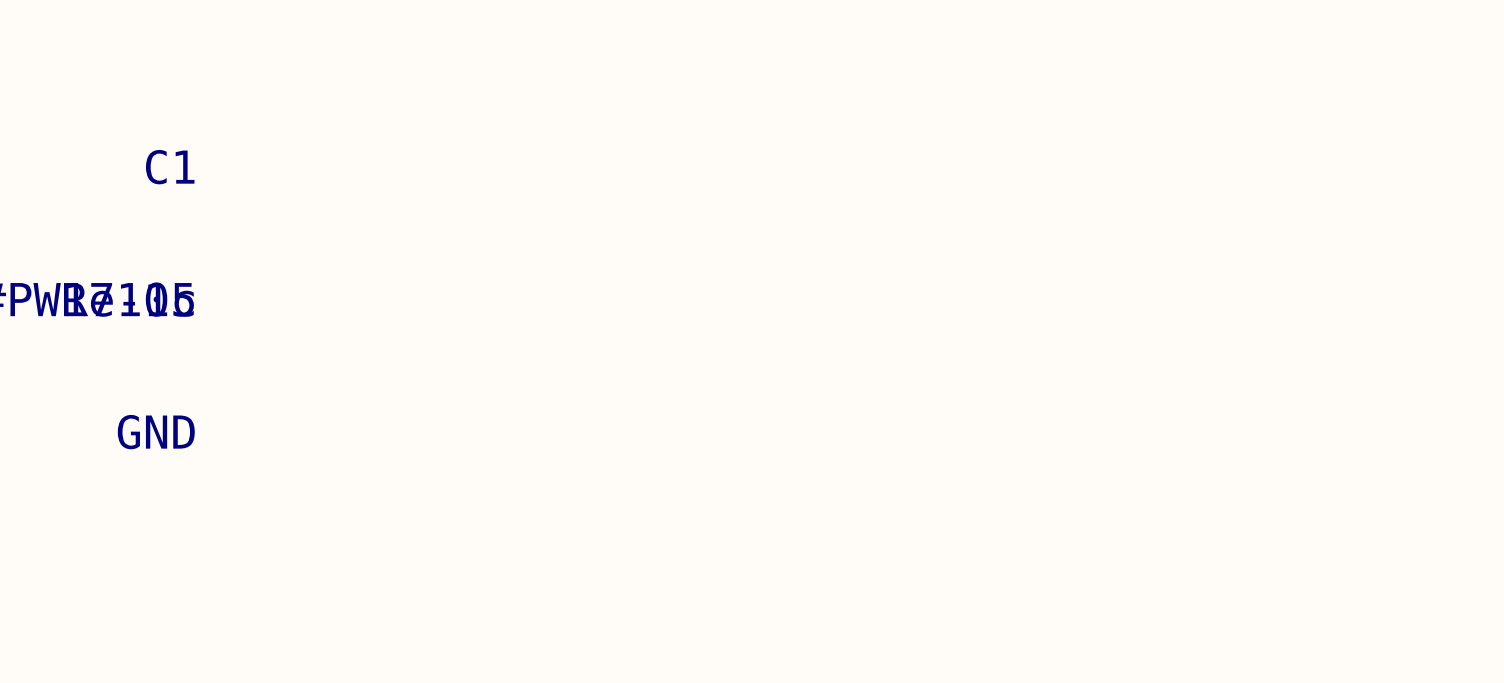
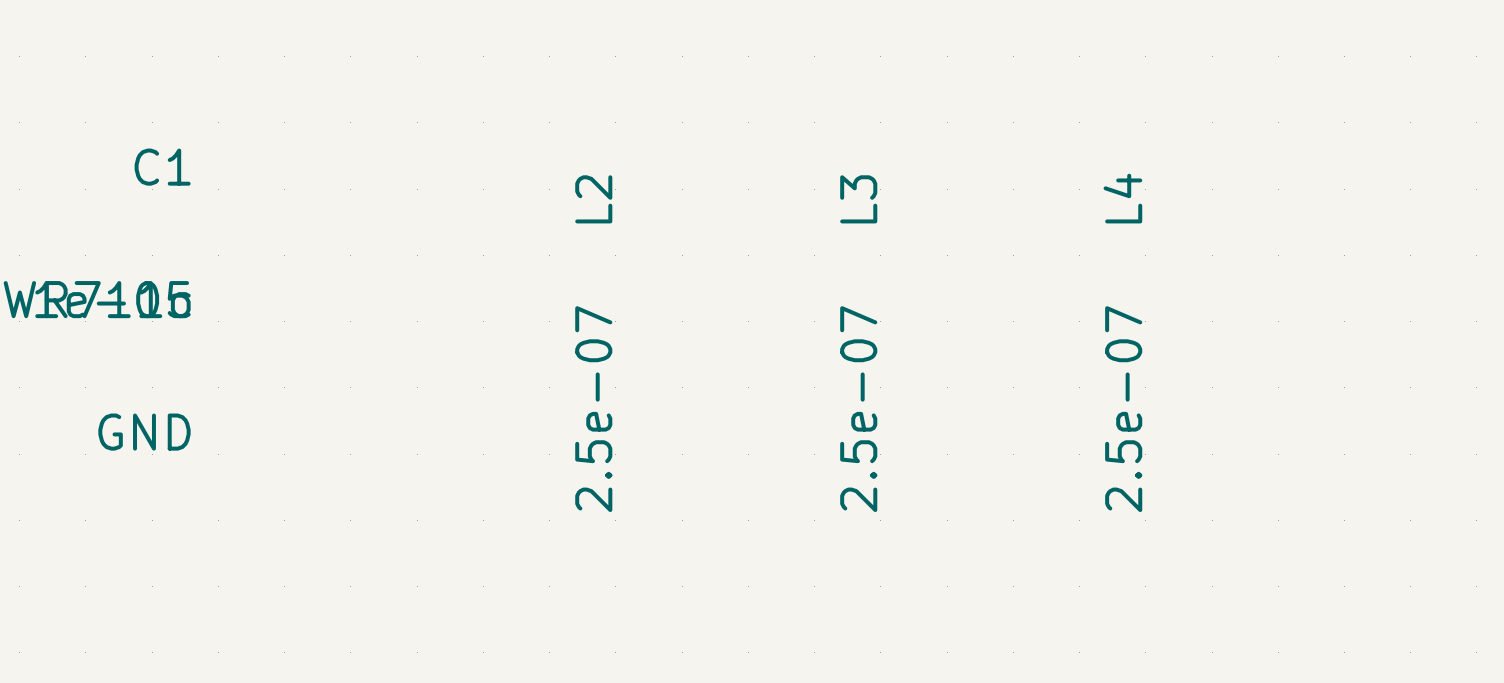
L4: none -> 2.5e-07 (1122, 342)
L2: none -> 2.5e-07 (593, 343)
L3: none -> 2.5e-07 (858, 343)

